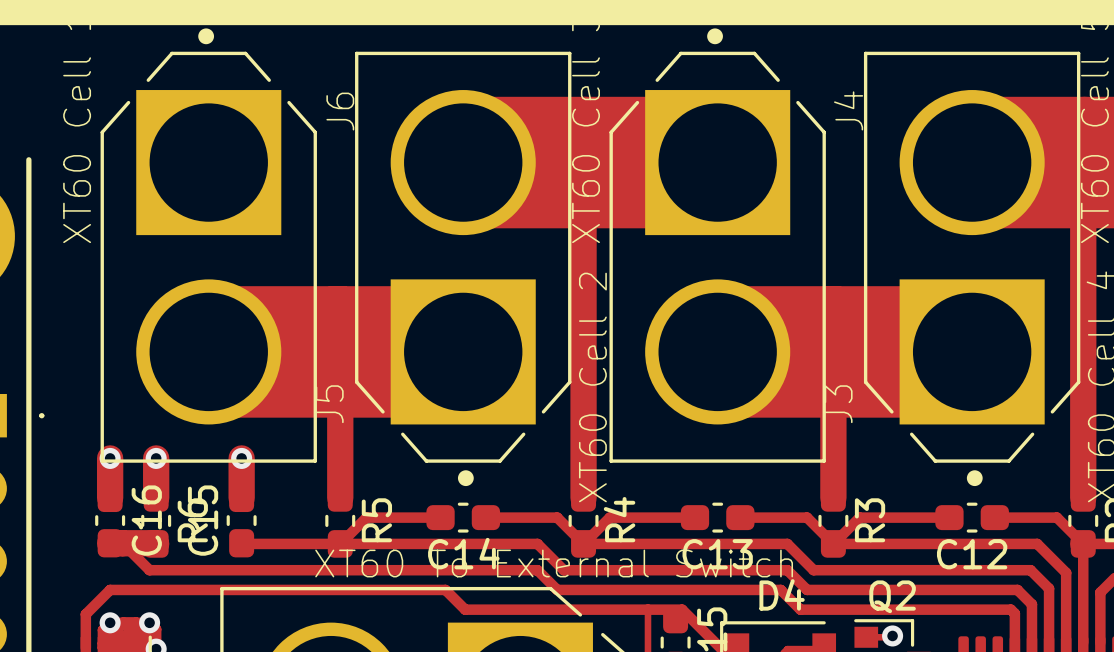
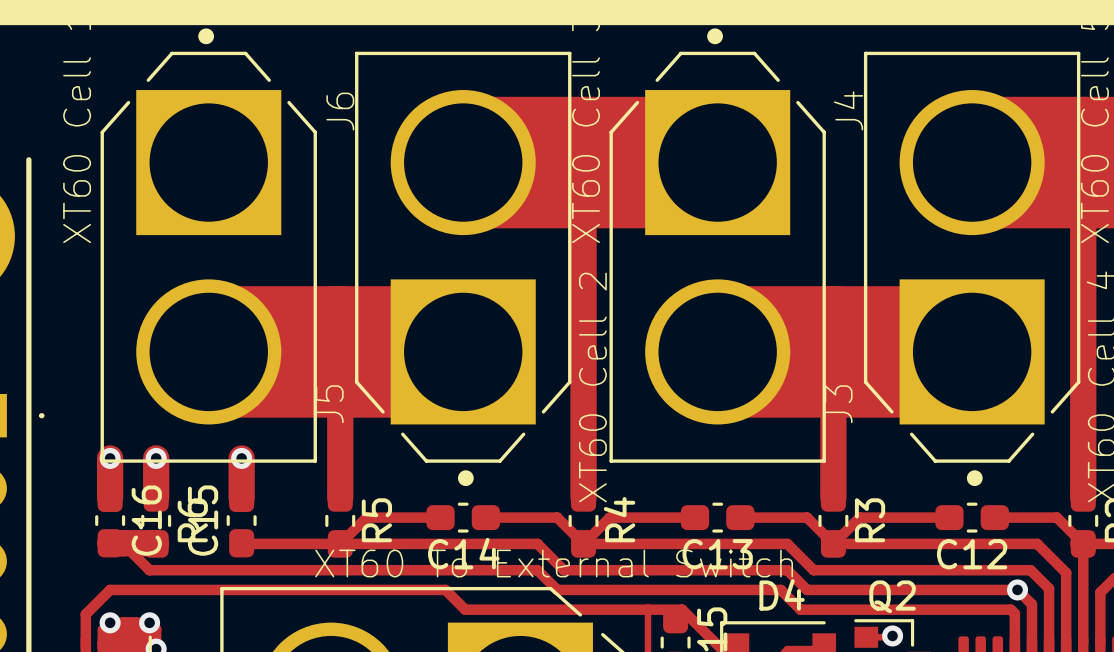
via: none -> (1017, 589)

